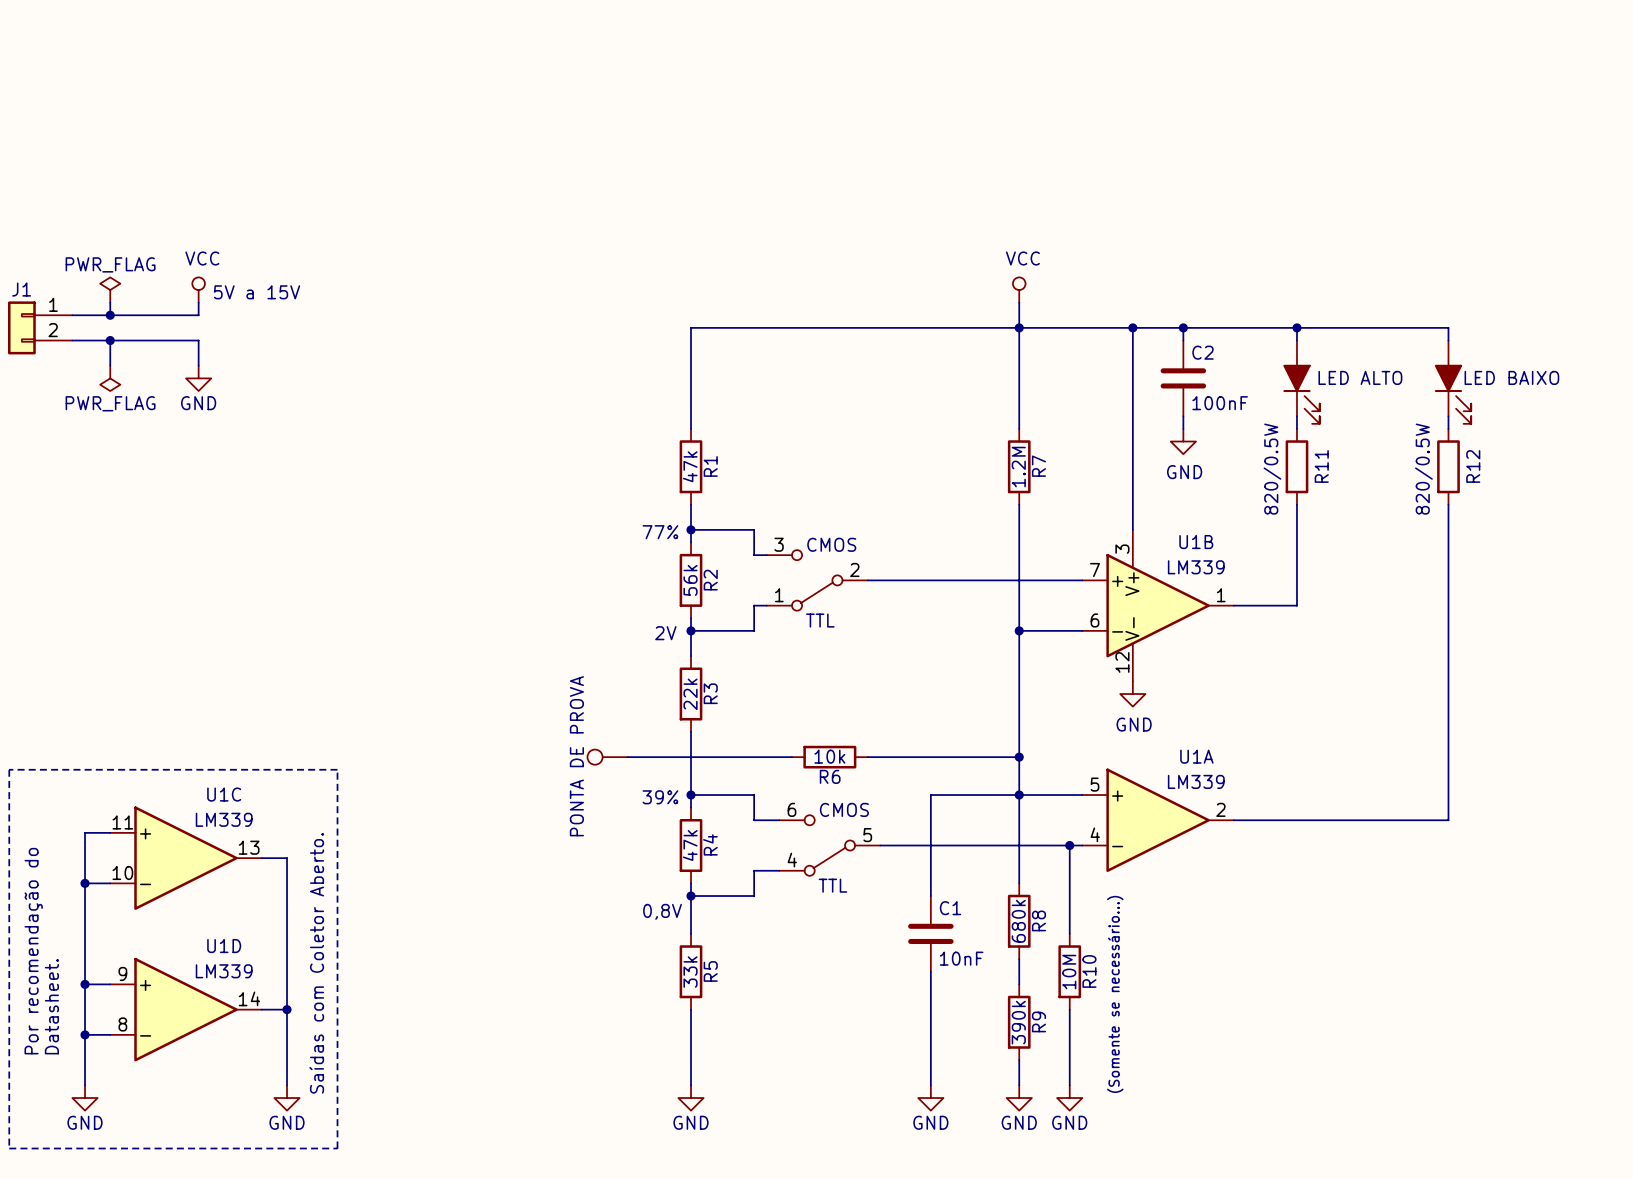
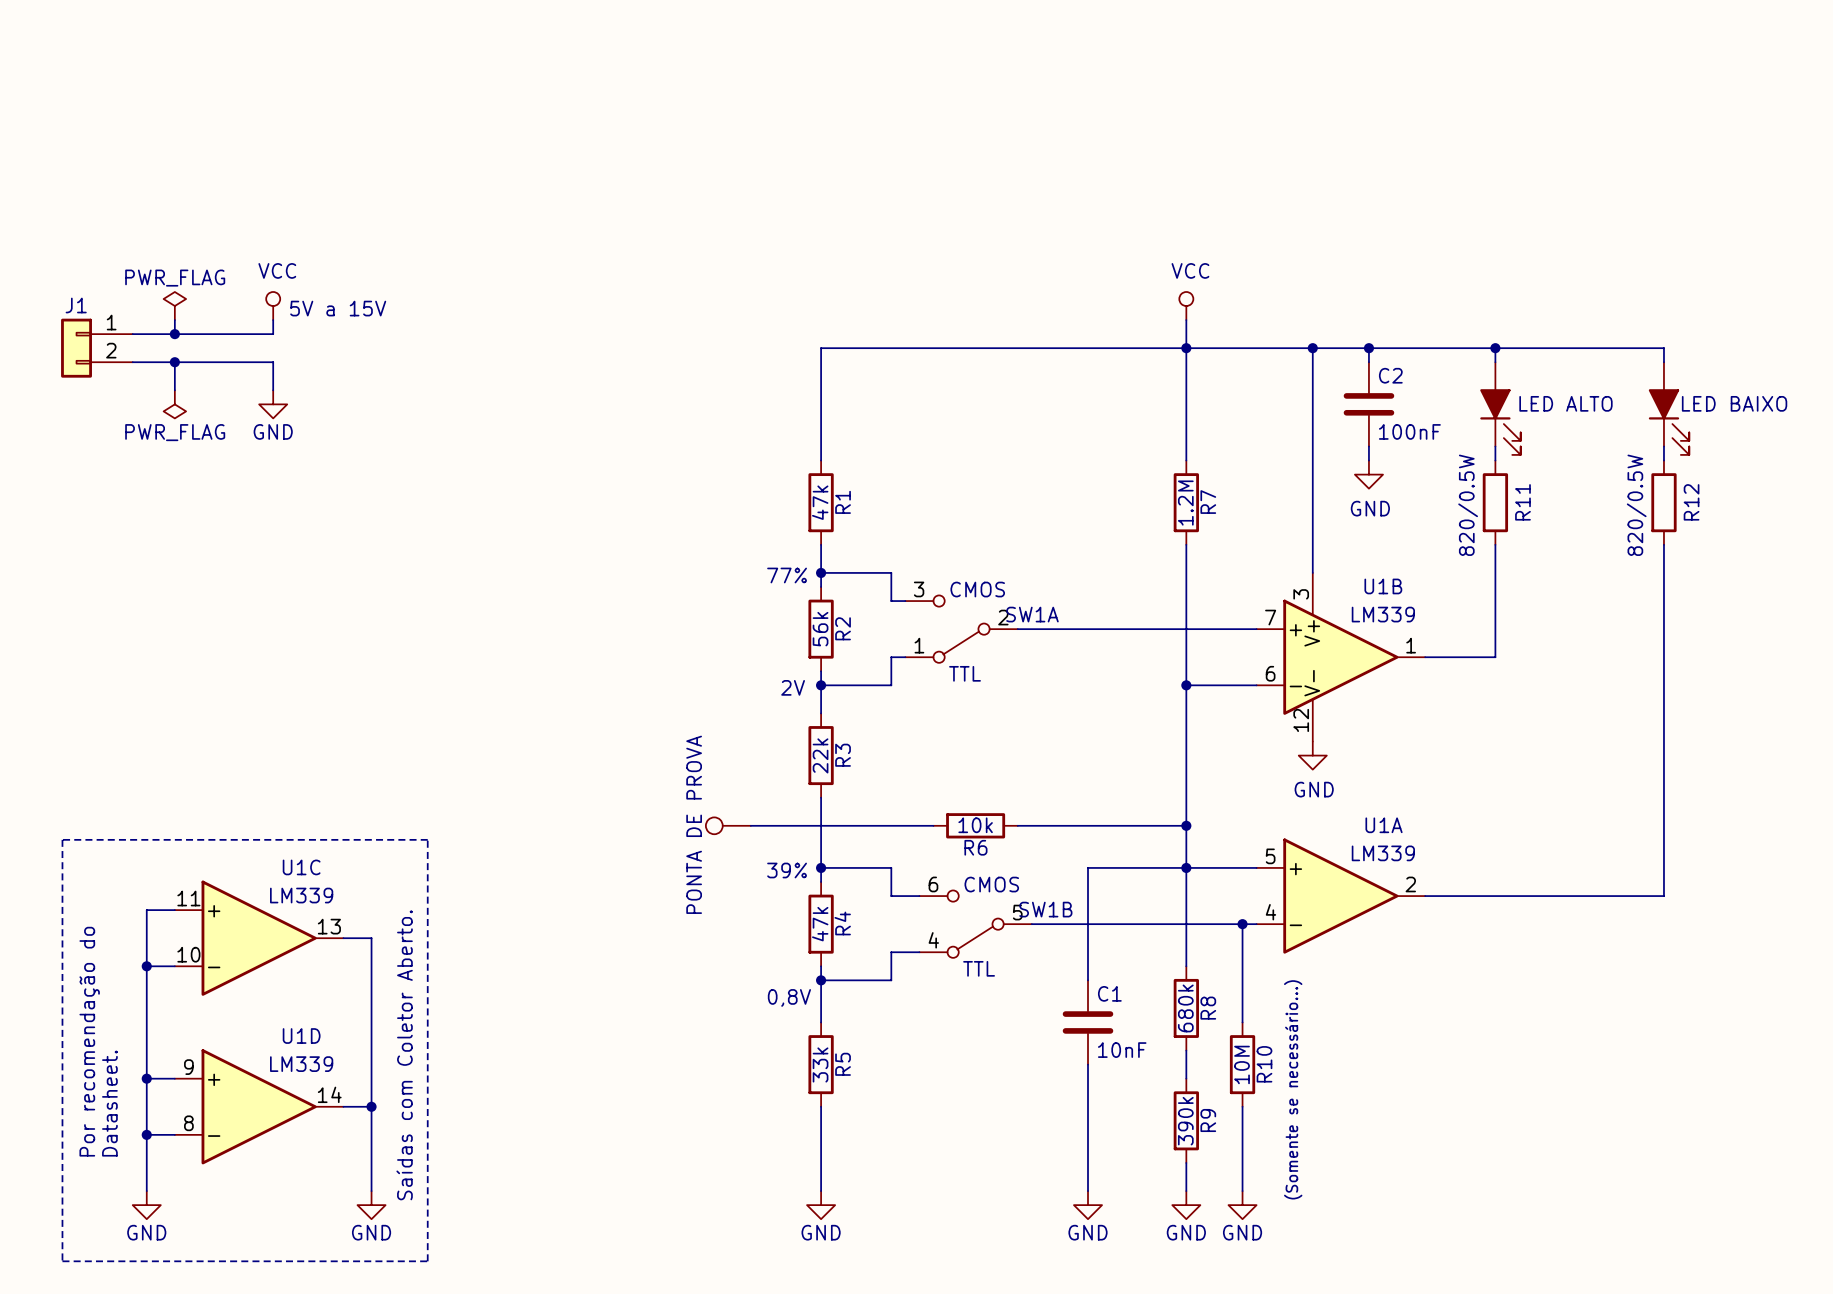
SW1A name: none -> SW1A (1032, 614)
SW1B name: none -> SW1B (1045, 909)

